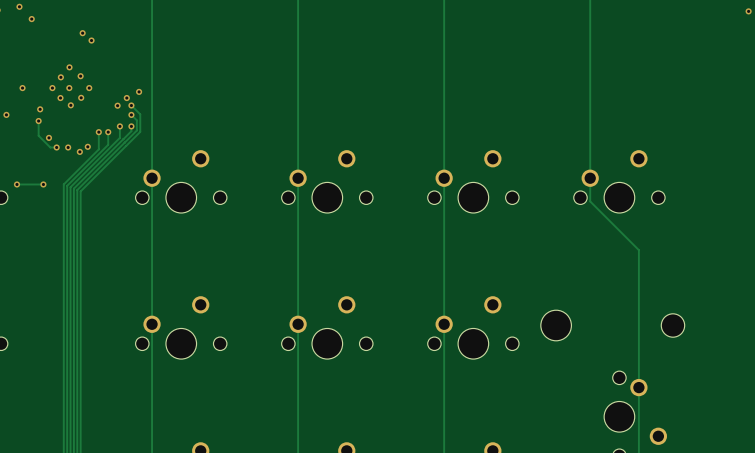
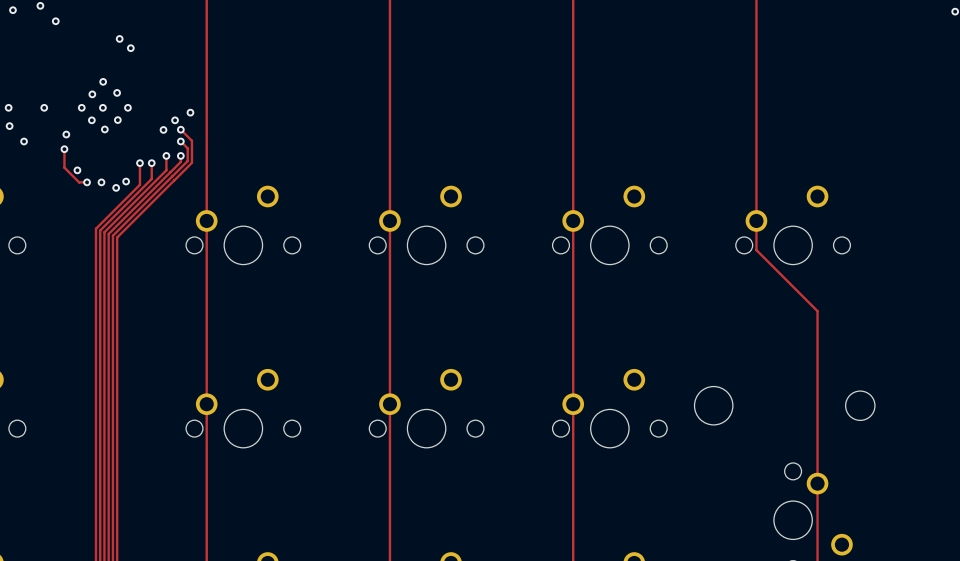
track: (16, 184) (43, 184) -> none
via: (16, 184) -> none
via: (43, 184) -> none

